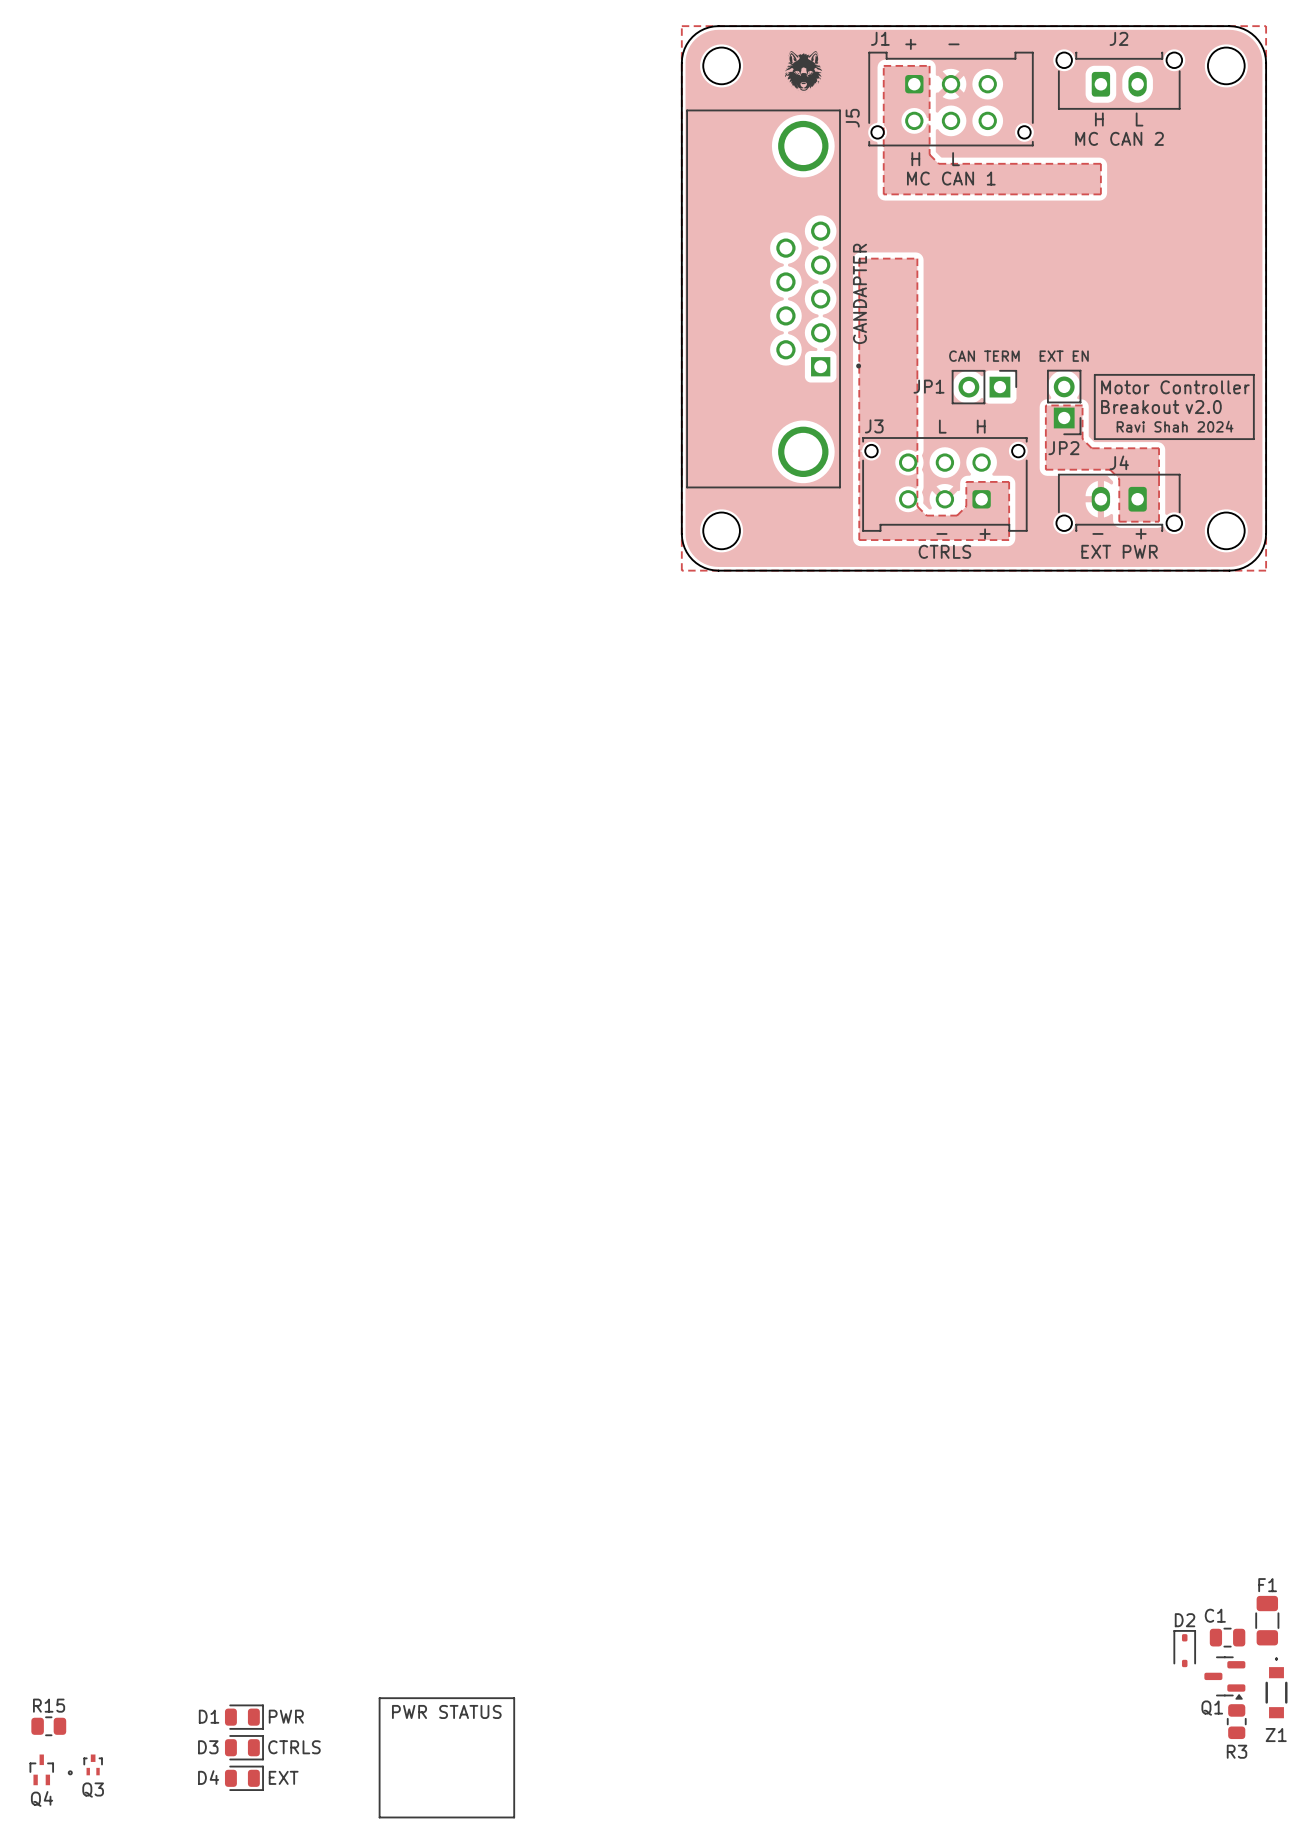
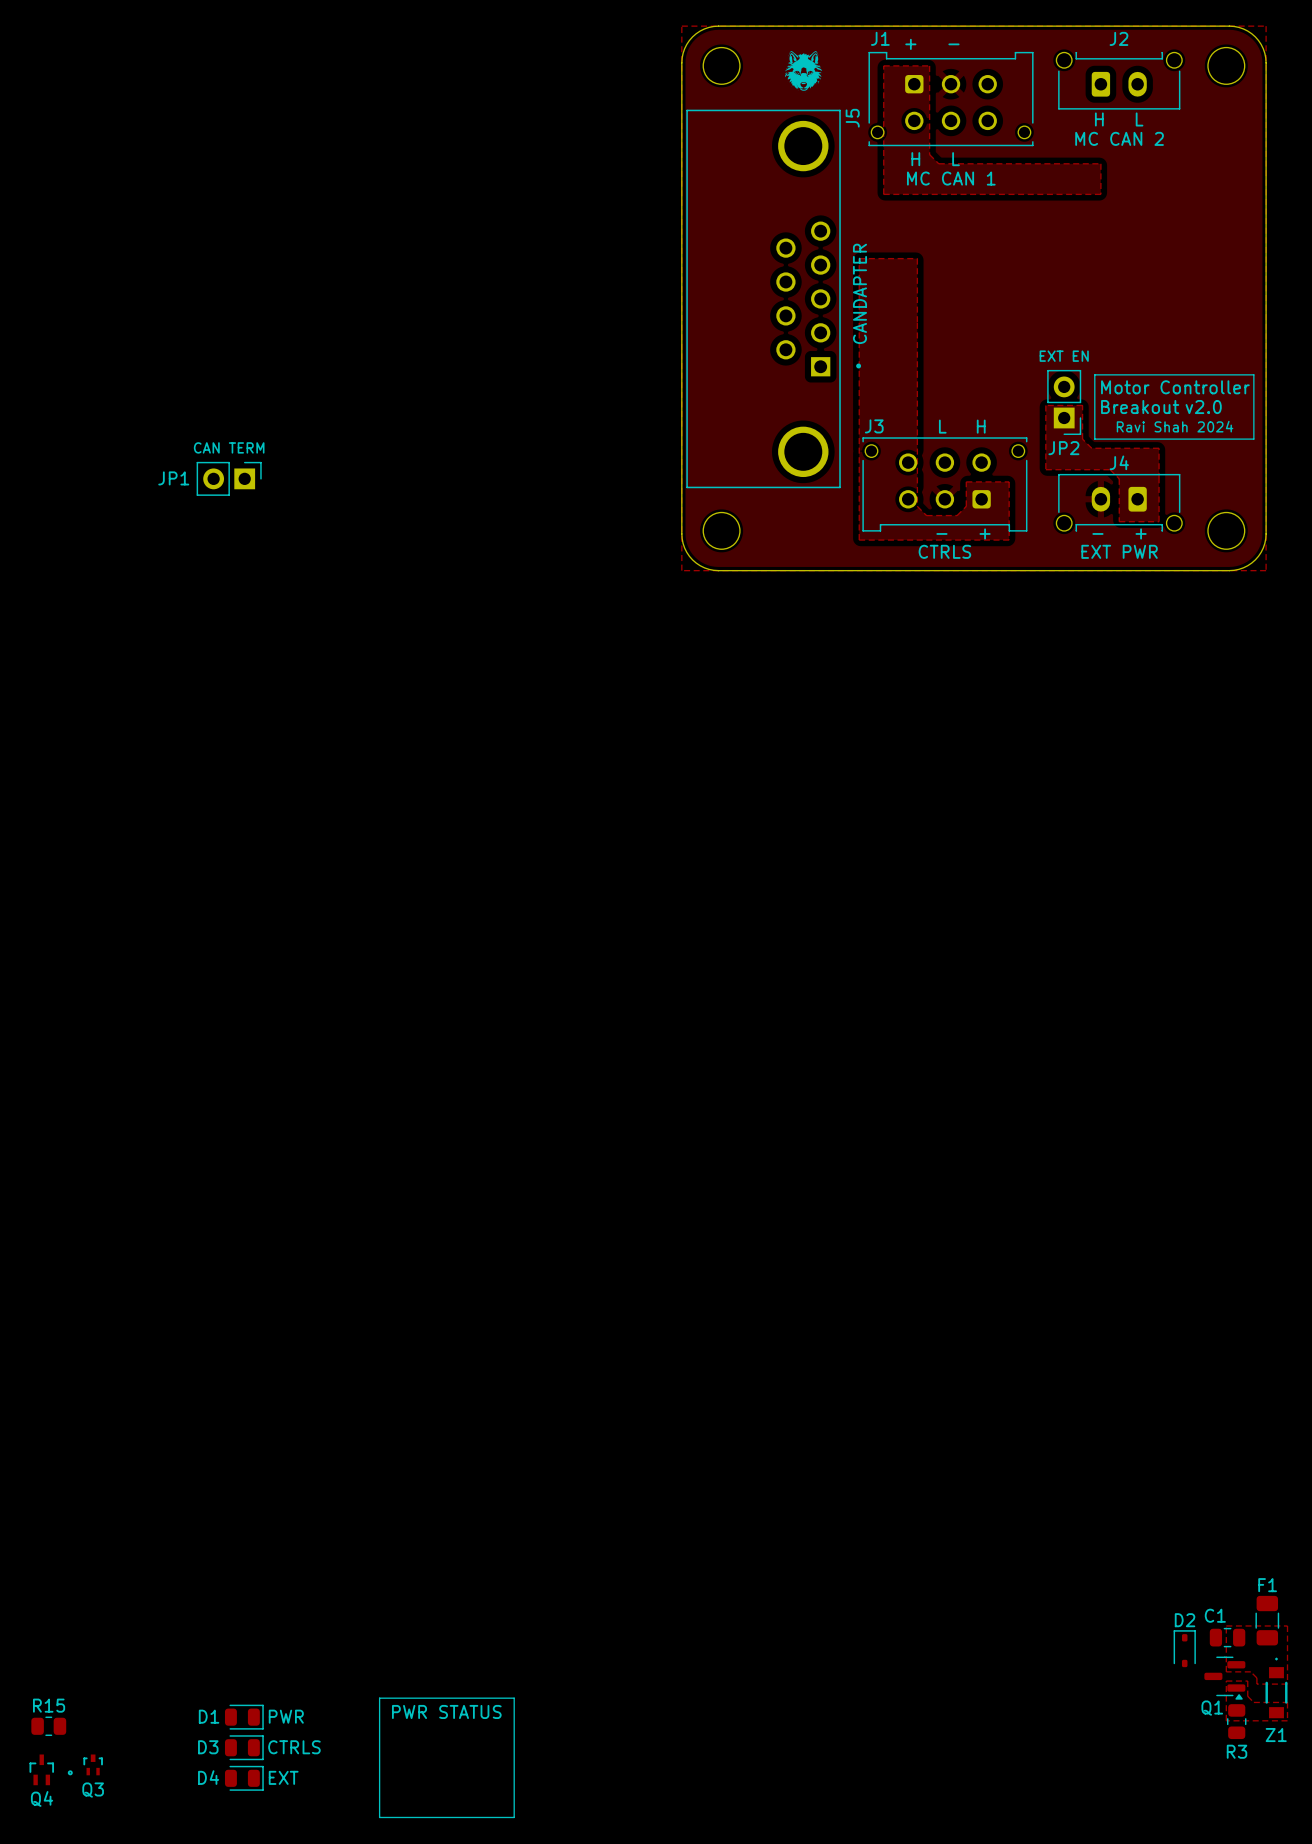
JP1 position: (984, 387) -> (229, 478)
zone outline: none -> (1226, 1625) (1226, 1671) (1250, 1671) (1256, 1677) (1256, 1684) (1287, 1684) (1287, 1625) (1226, 1625)
zone outline: none -> (1226, 1681) (1226, 1720) (1287, 1720) (1287, 1702) (1253, 1702) (1247, 1696) (1247, 1681) (1226, 1681)

